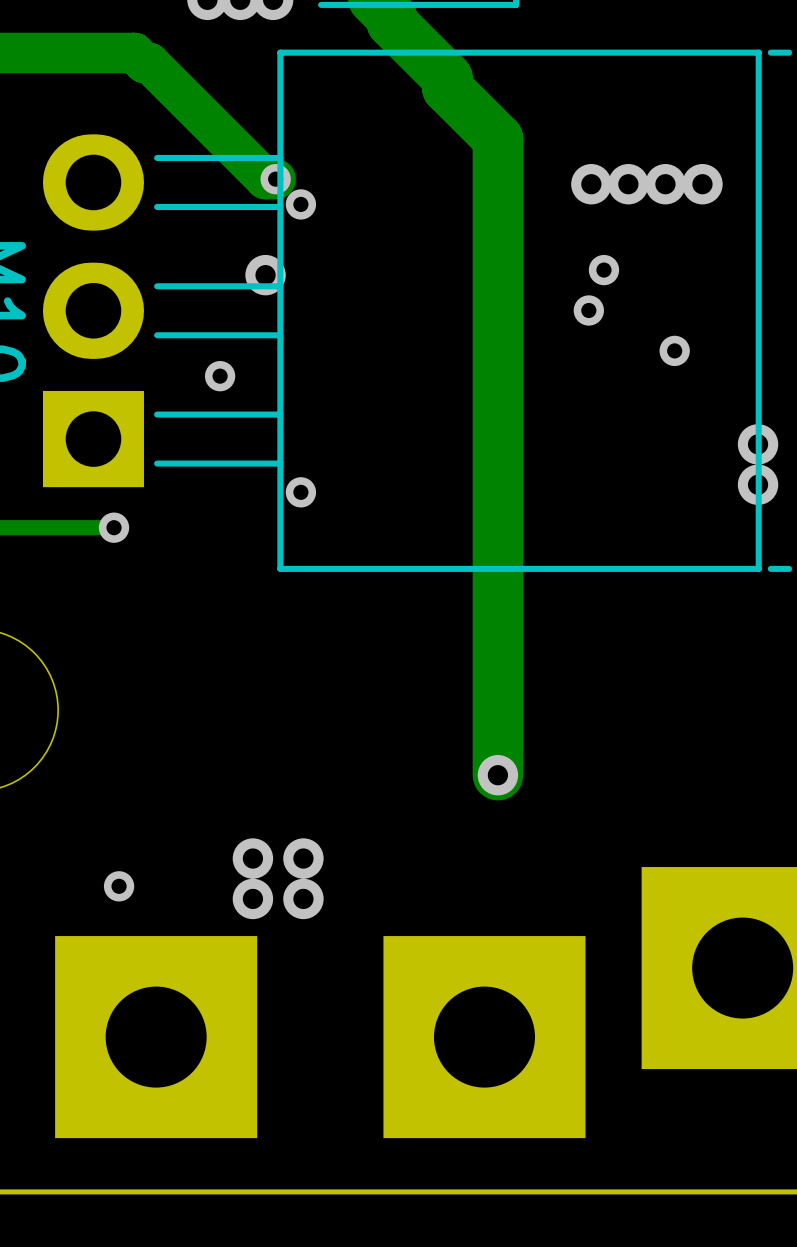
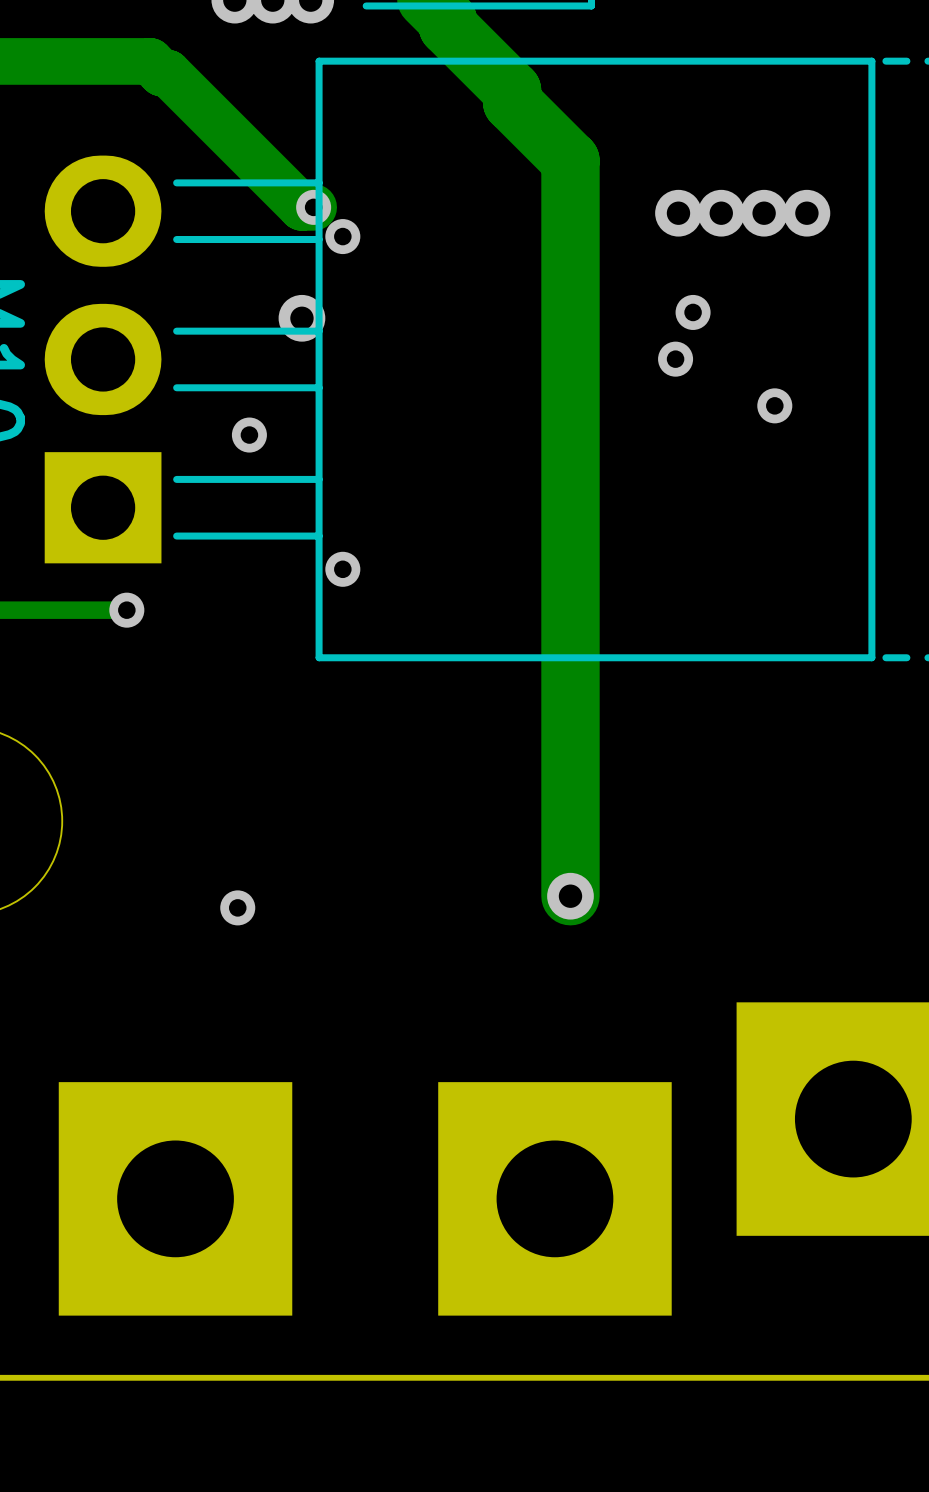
via: (758, 444) -> none
via: (758, 484) -> none
via: (252, 858) -> none
via: (303, 858) -> none
via position: (119, 886) -> (237, 907)
via: (252, 898) -> none
via: (303, 898) -> none

